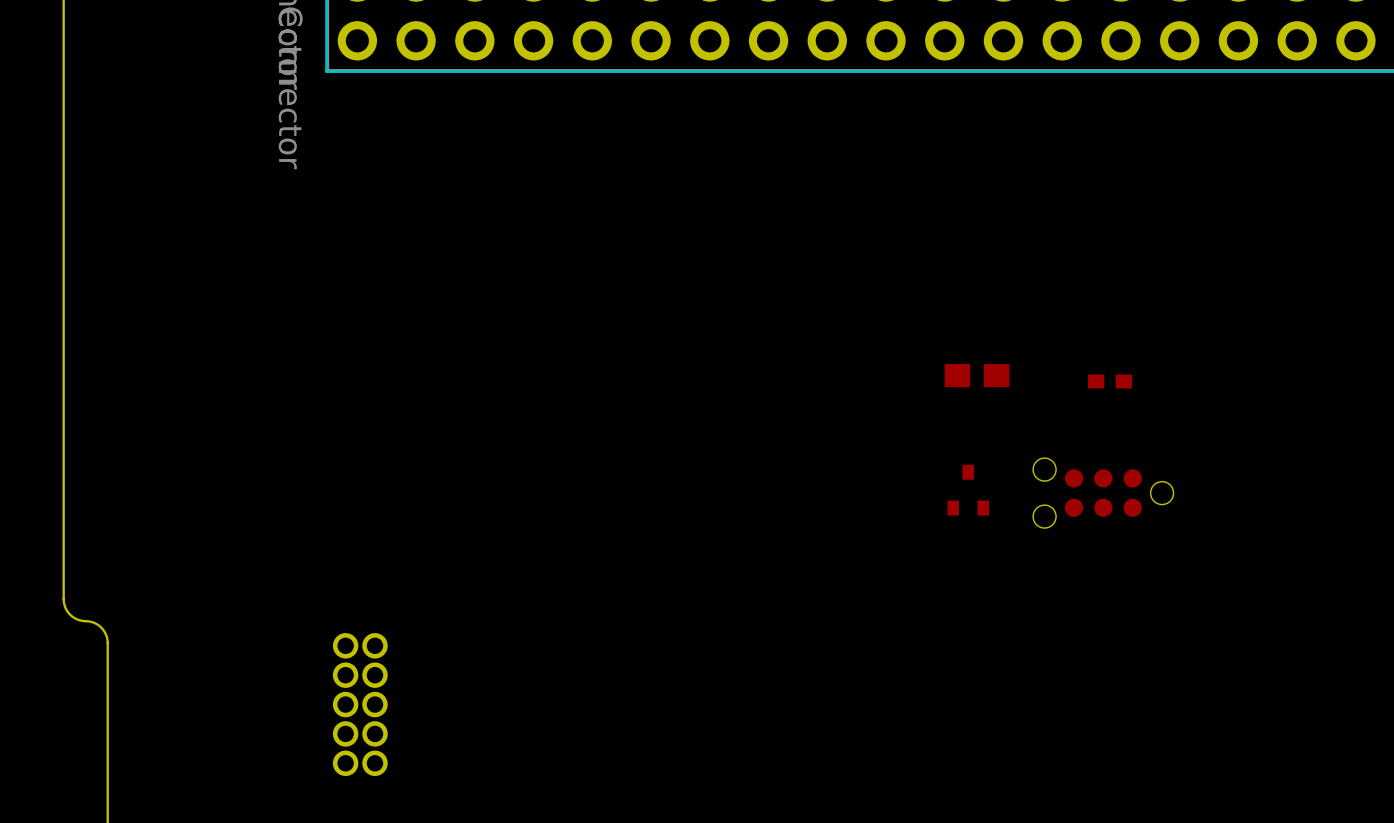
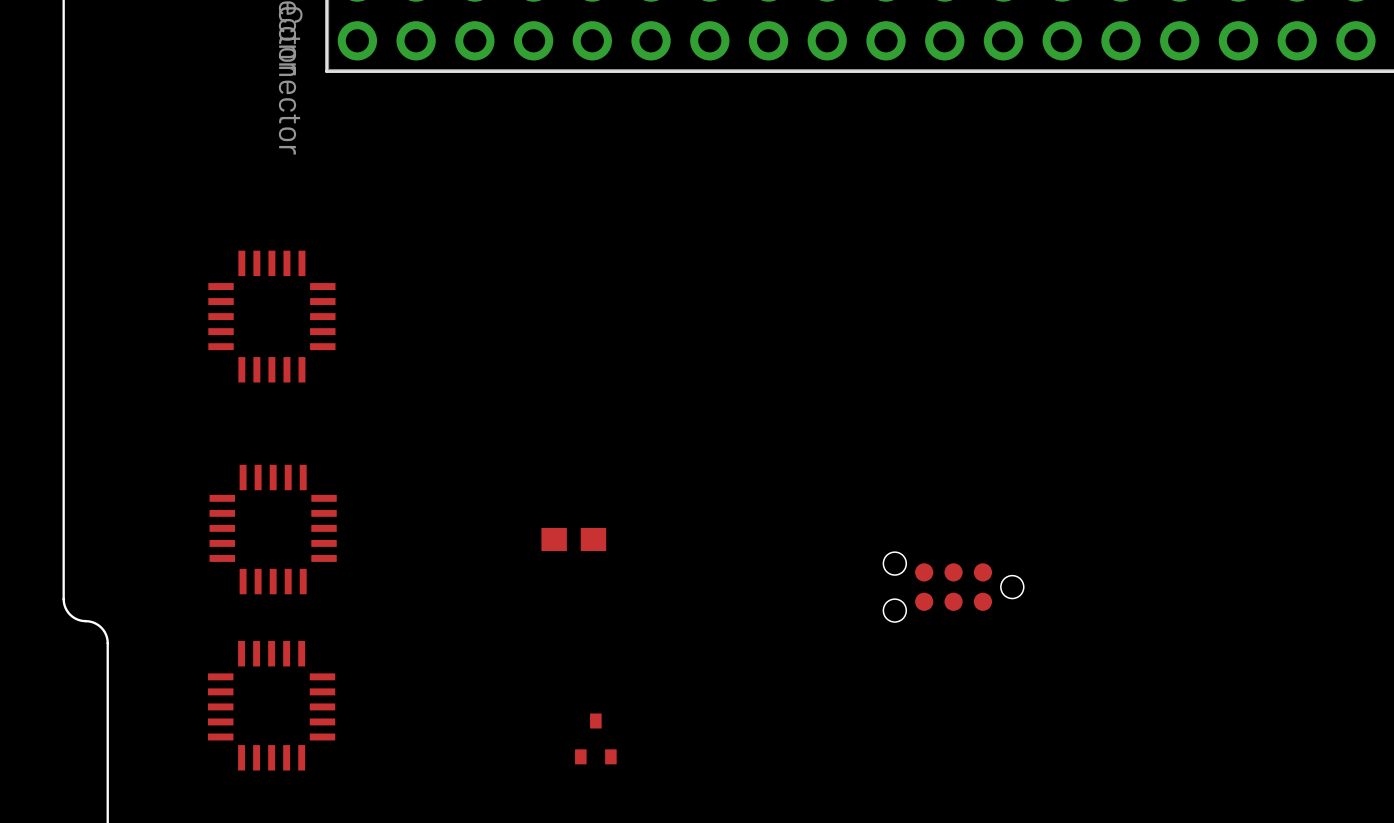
part: none -> (271, 316)
part position: (977, 375) -> (573, 539)
part: (1110, 381) -> none
part position: (968, 490) -> (595, 738)
part position: (1103, 493) -> (953, 587)
part: none -> (273, 529)
part: (360, 704) -> none
part: none -> (271, 705)

